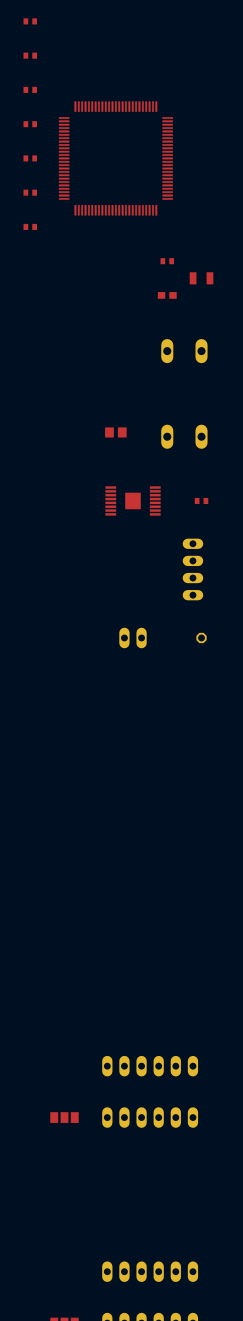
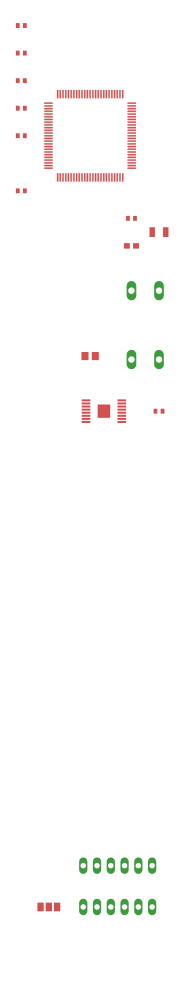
part: (30, 192) -> none
part: (192, 569) -> none
part: (133, 637) -> none
part: (201, 637) -> none

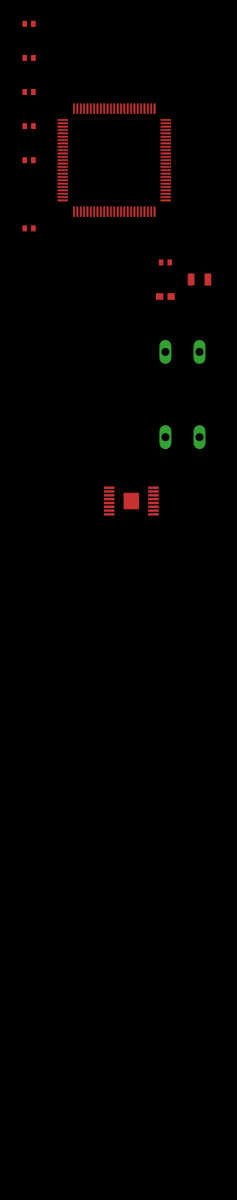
part: (90, 356) -> none
part: (158, 411) -> none
part: (117, 865) -> none
part: (48, 906) -> none
part: (117, 906) -> none

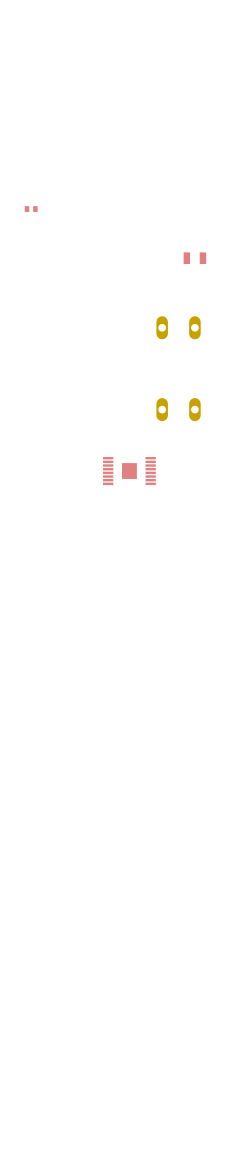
part: (29, 23) -> none
part: (29, 57) -> none
part: (29, 92) -> none
part: (29, 126) -> none
part: (29, 160) -> none
part: (114, 160) -> none
part: (165, 262) -> none
part: (165, 296) -> none

